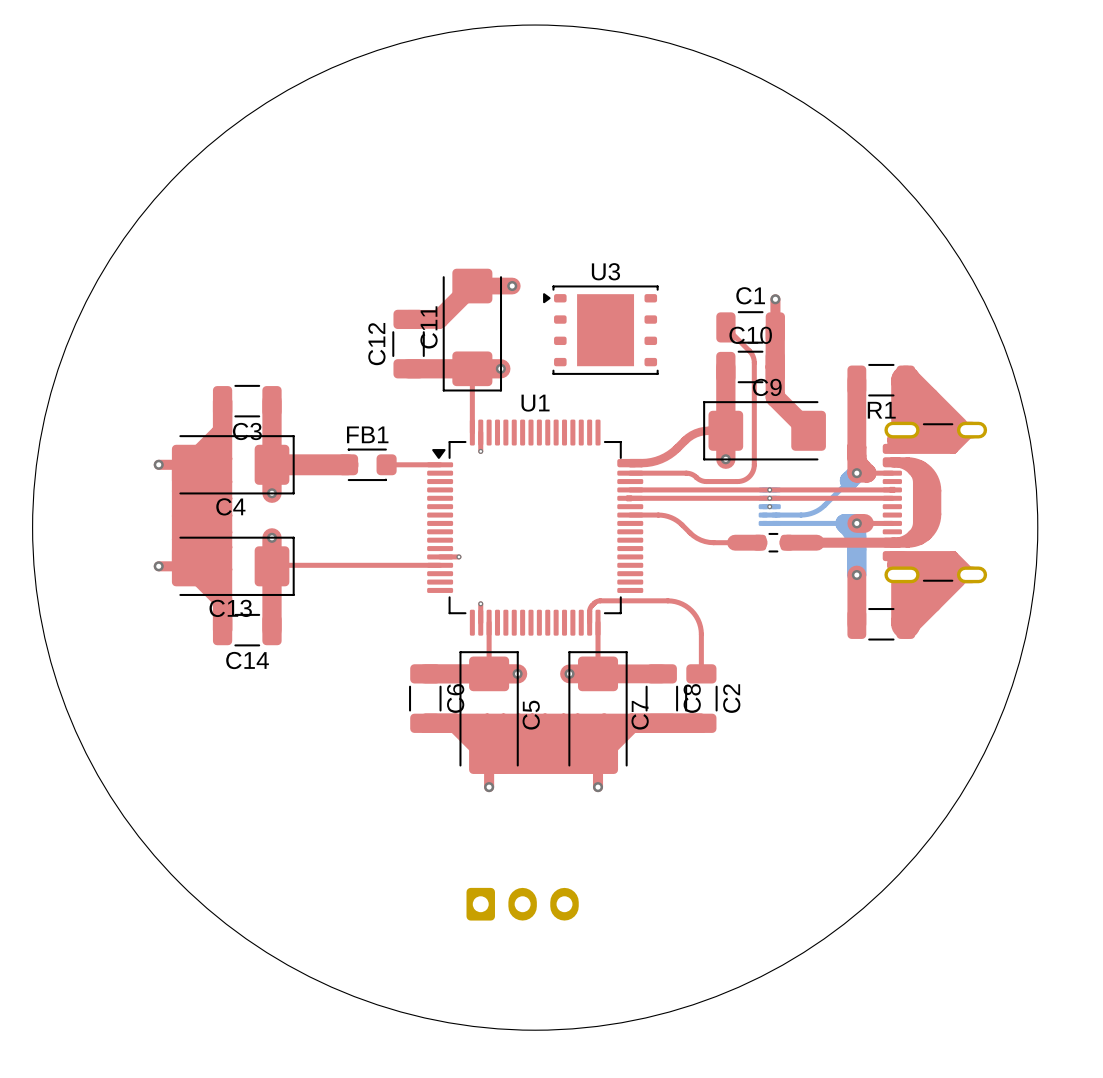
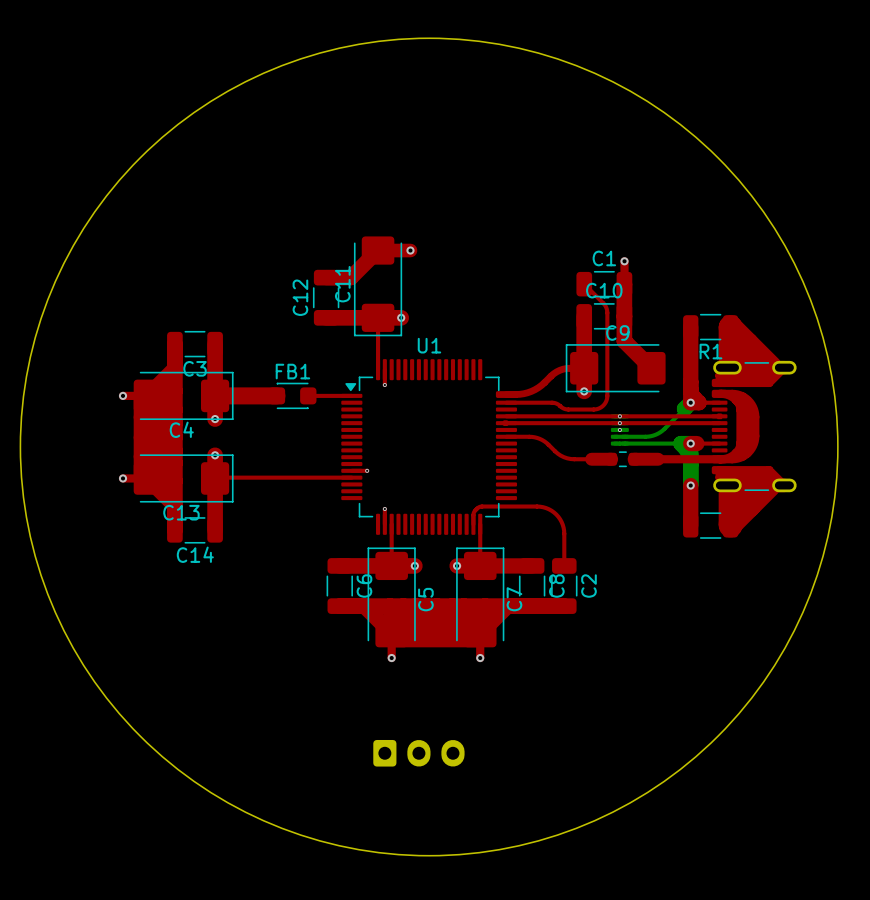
U3: (600, 330) -> none

